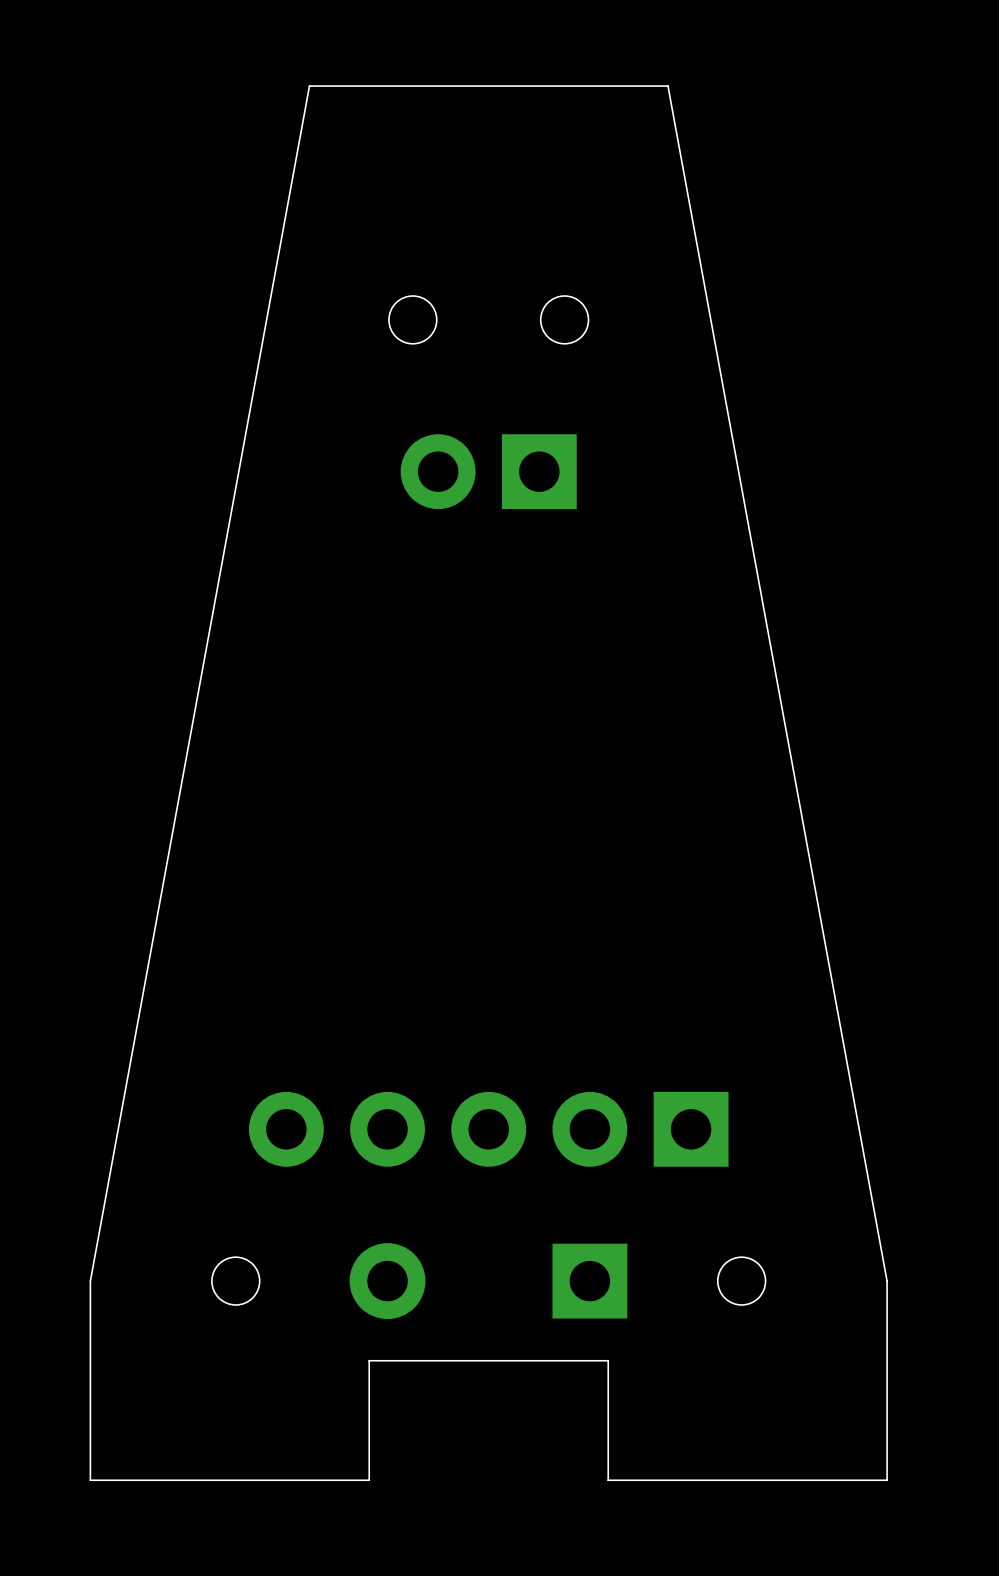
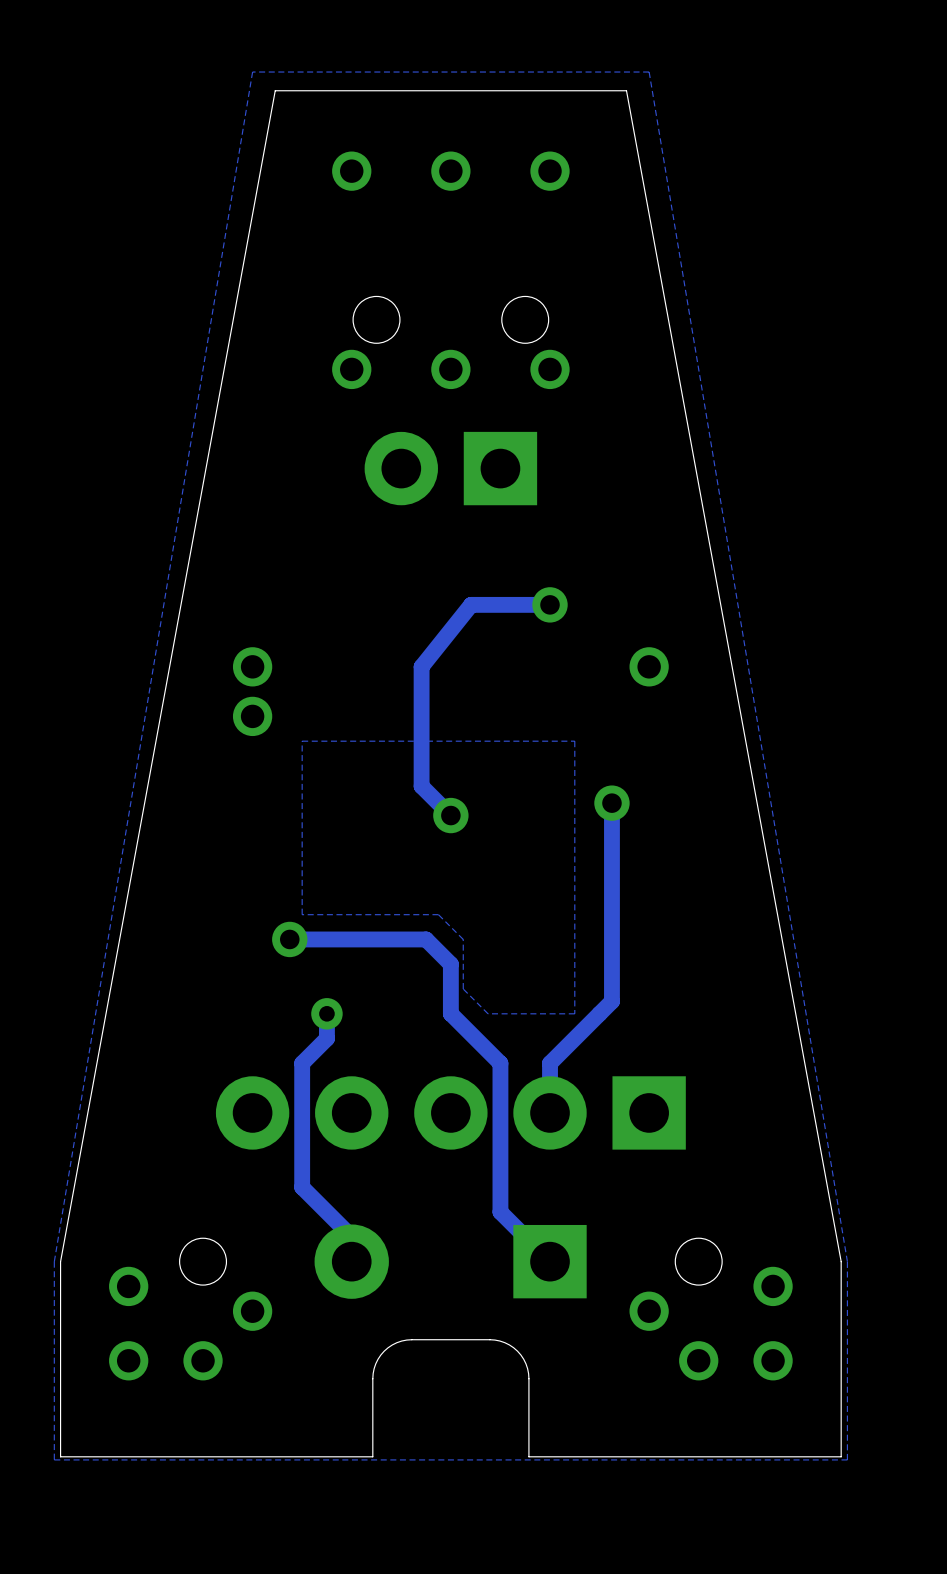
zone outline: none -> (649, 72) (252, 72) (54, 1261) (54, 1459) (847, 1459) (847, 1261) (649, 72)
via: none -> (351, 171)
via: none -> (450, 171)
via: none -> (550, 171)
via: none -> (351, 369)
via: none -> (450, 369)
via: none -> (550, 369)
track: none -> (550, 604) (471, 604) (421, 666) (421, 786) (450, 815)
via: none -> (550, 604)
via: none -> (252, 666)
via: none -> (649, 666)
via: none -> (252, 716)
zone outline: none -> (574, 741) (574, 1013) (488, 1013) (463, 989) (463, 939) (438, 914) (302, 914) (302, 741) (574, 741)
track: none -> (611, 803) (611, 1001) (550, 1063) (550, 1112)
via: none -> (611, 803)
via: none -> (450, 815)
track: none -> (289, 939) (426, 939) (450, 964) (450, 1013) (500, 1063) (500, 1212) (525, 1236) (550, 1236)
via: none -> (289, 939)
track: none -> (326, 1013) (326, 1038) (302, 1063) (302, 1187) (351, 1236)
via: none -> (326, 1013)
via: none -> (128, 1286)
via: none -> (773, 1286)
via: none -> (252, 1311)
via: none -> (649, 1311)
board edge: (448, 1360) (369, 1360) (369, 1480) -> (411, 1339) (396, 1342) (388, 1347) (380, 1354) (374, 1368) (372, 1456) (333, 1456)
board edge: (528, 1360) (608, 1360) (608, 1480) -> (489, 1339) (504, 1342) (513, 1347) (520, 1354) (527, 1368) (528, 1456) (567, 1456)
via: none -> (128, 1360)
via: none -> (203, 1360)
via: none -> (698, 1360)
via: none -> (773, 1360)

